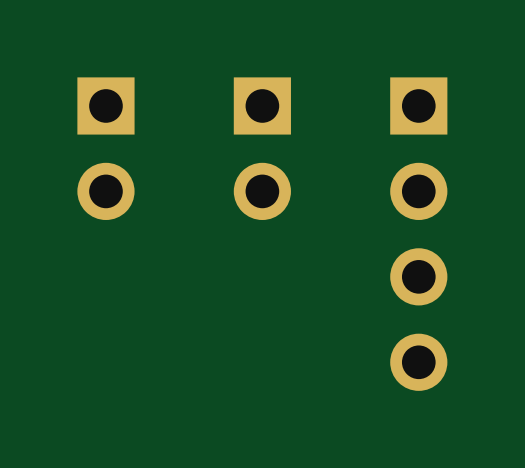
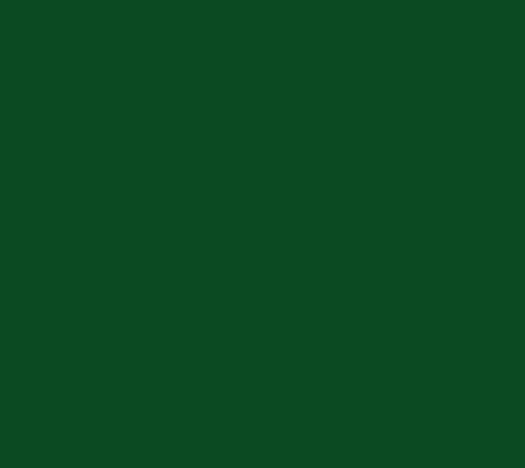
part: (105, 148) -> none
part: (262, 148) -> none
part: (418, 234) -> none

